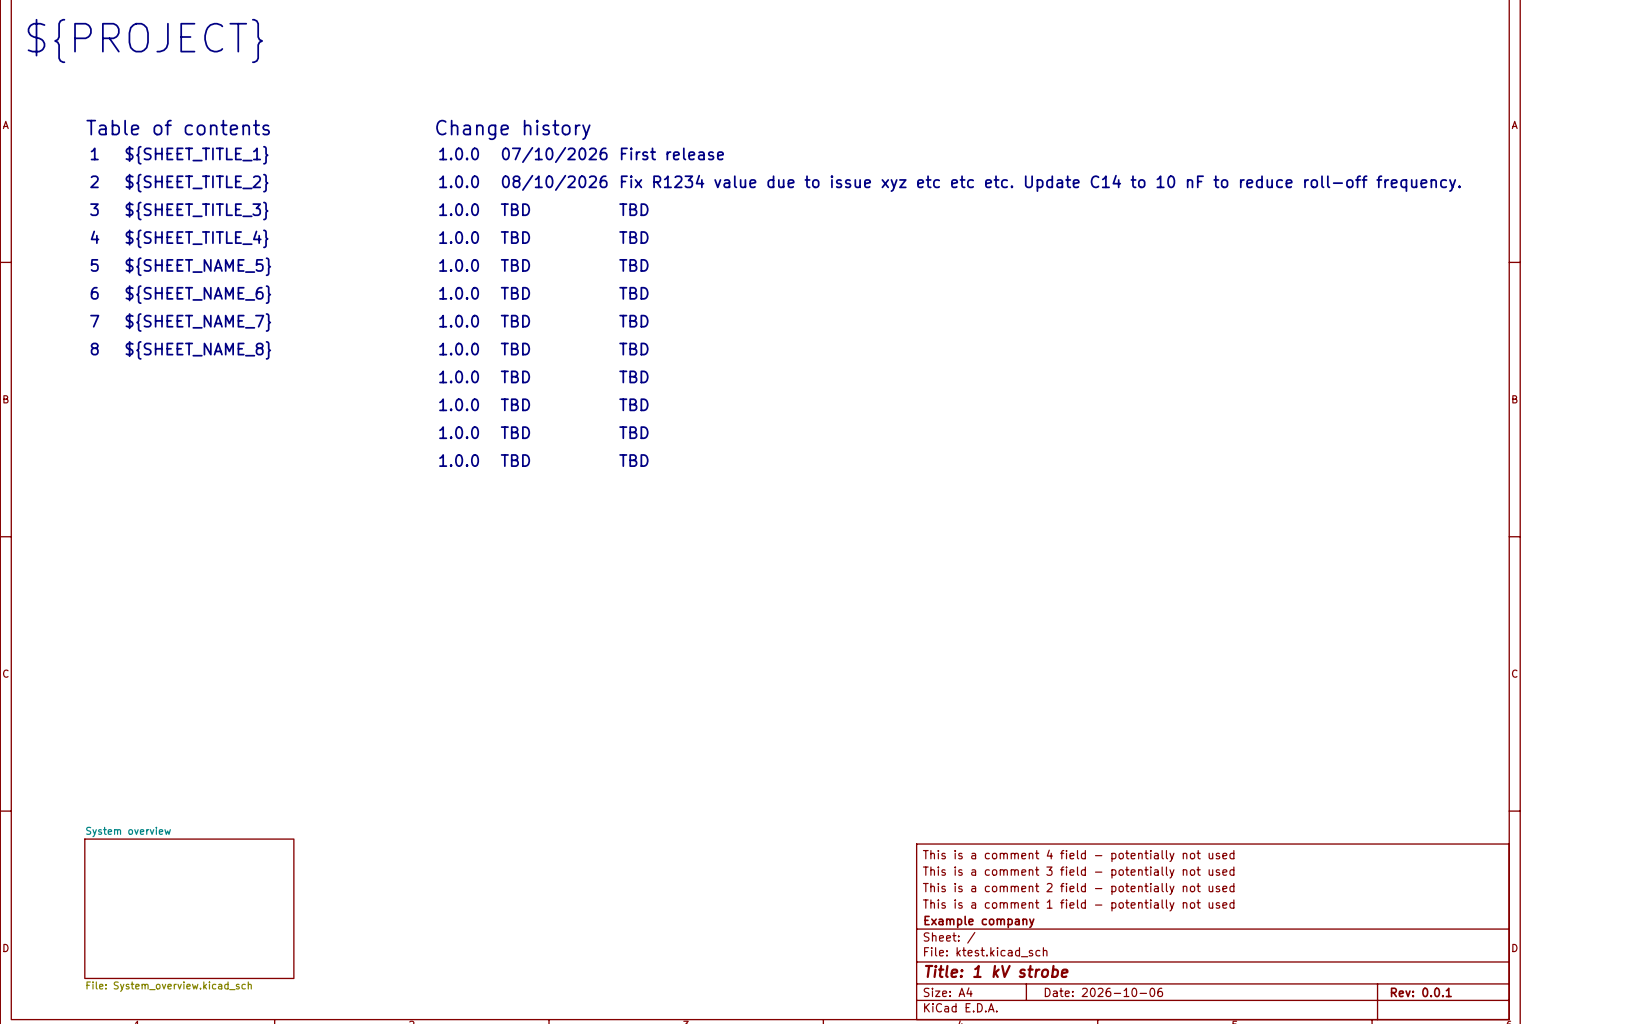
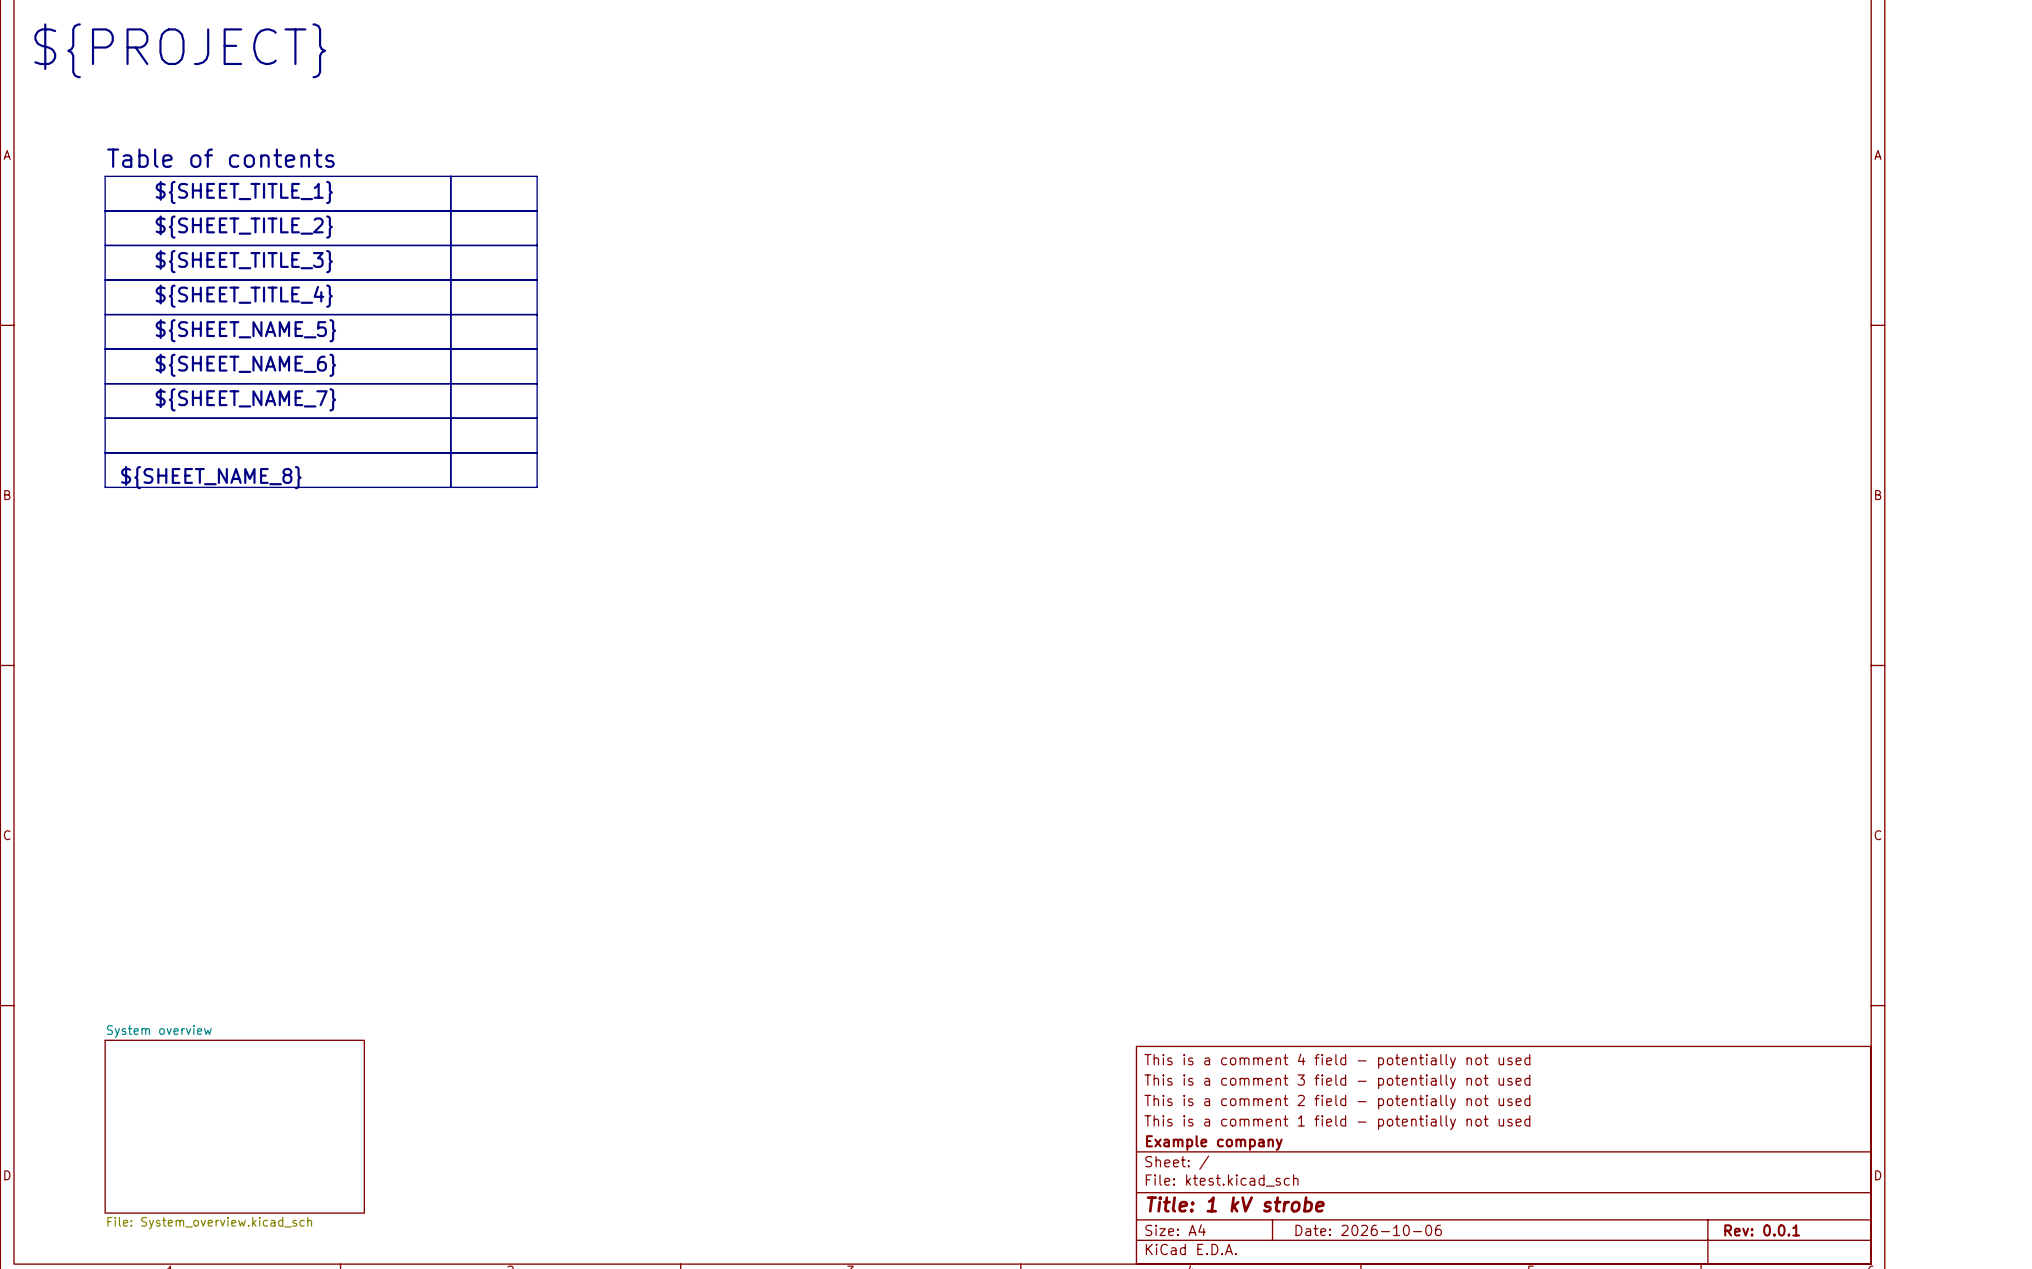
text: Change history (513, 129) -> none
line: none -> (105, 176) (537, 176) (537, 487) (105, 487) (105, 176)
line: none -> (450, 176) (450, 487)
text: 1 (94, 153) -> none
text: 1.0.0 (459, 153) -> none
text: First release (672, 153) -> none
text: 07/10/2026 (554, 154) -> none
line: none -> (105, 210) (537, 210)
text: 2 (94, 181) -> none
text: 1.0.0 (459, 181) -> none
text: 08/10/2026 (554, 182) -> none
text: Fix R1234 value due to issue xyz etc etc etc. Update C14 to 10 nF to reduce roll-off frequency. (1040, 183) -> none
line: none -> (105, 245) (537, 245)
text: 3 (94, 209) -> none
text: 1.0.0 (459, 209) -> none
text: TBD (515, 209) -> none
text: TBD (633, 209) -> none
line: none -> (105, 280) (537, 280)
text: 4 (95, 237) -> none
text: 1.0.0 (459, 237) -> none
text: TBD (515, 237) -> none
text: TBD (633, 237) -> none
line: none -> (105, 314) (537, 314)
text: 5 (94, 265) -> none
text: 1.0.0 (459, 265) -> none
text: TBD (515, 265) -> none
text: TBD (633, 265) -> none
line: none -> (105, 349) (537, 349)
text: 6 (94, 293) -> none
text: 1.0.0 (459, 293) -> none
text: TBD (515, 293) -> none
text: TBD (633, 293) -> none
line: none -> (105, 383) (537, 383)
text: 7 (94, 321) -> none
text: 1.0.0 (459, 321) -> none
text: TBD (515, 321) -> none
text: TBD (633, 321) -> none
line: none -> (105, 418) (537, 418)
text: 8 (94, 349) -> none
text: 1.0.0 (459, 349) -> none
text: TBD (515, 349) -> none
text: TBD (633, 349) -> none
text position: ${SHEET_NAME_8} (198, 350) -> ${SHEET_NAME_8} (211, 477)
line: none -> (105, 452) (537, 452)
text: 1.0.0 (459, 376) -> none
text: TBD (515, 376) -> none
text: TBD (633, 376) -> none
text: 1.0.0 (459, 404) -> none
text: TBD (515, 404) -> none
text: TBD (633, 404) -> none
text: 1.0.0 (459, 432) -> none
text: TBD (515, 432) -> none
text: TBD (633, 432) -> none
text: 1.0.0 (459, 460) -> none
text: TBD (515, 460) -> none
text: TBD (633, 460) -> none

